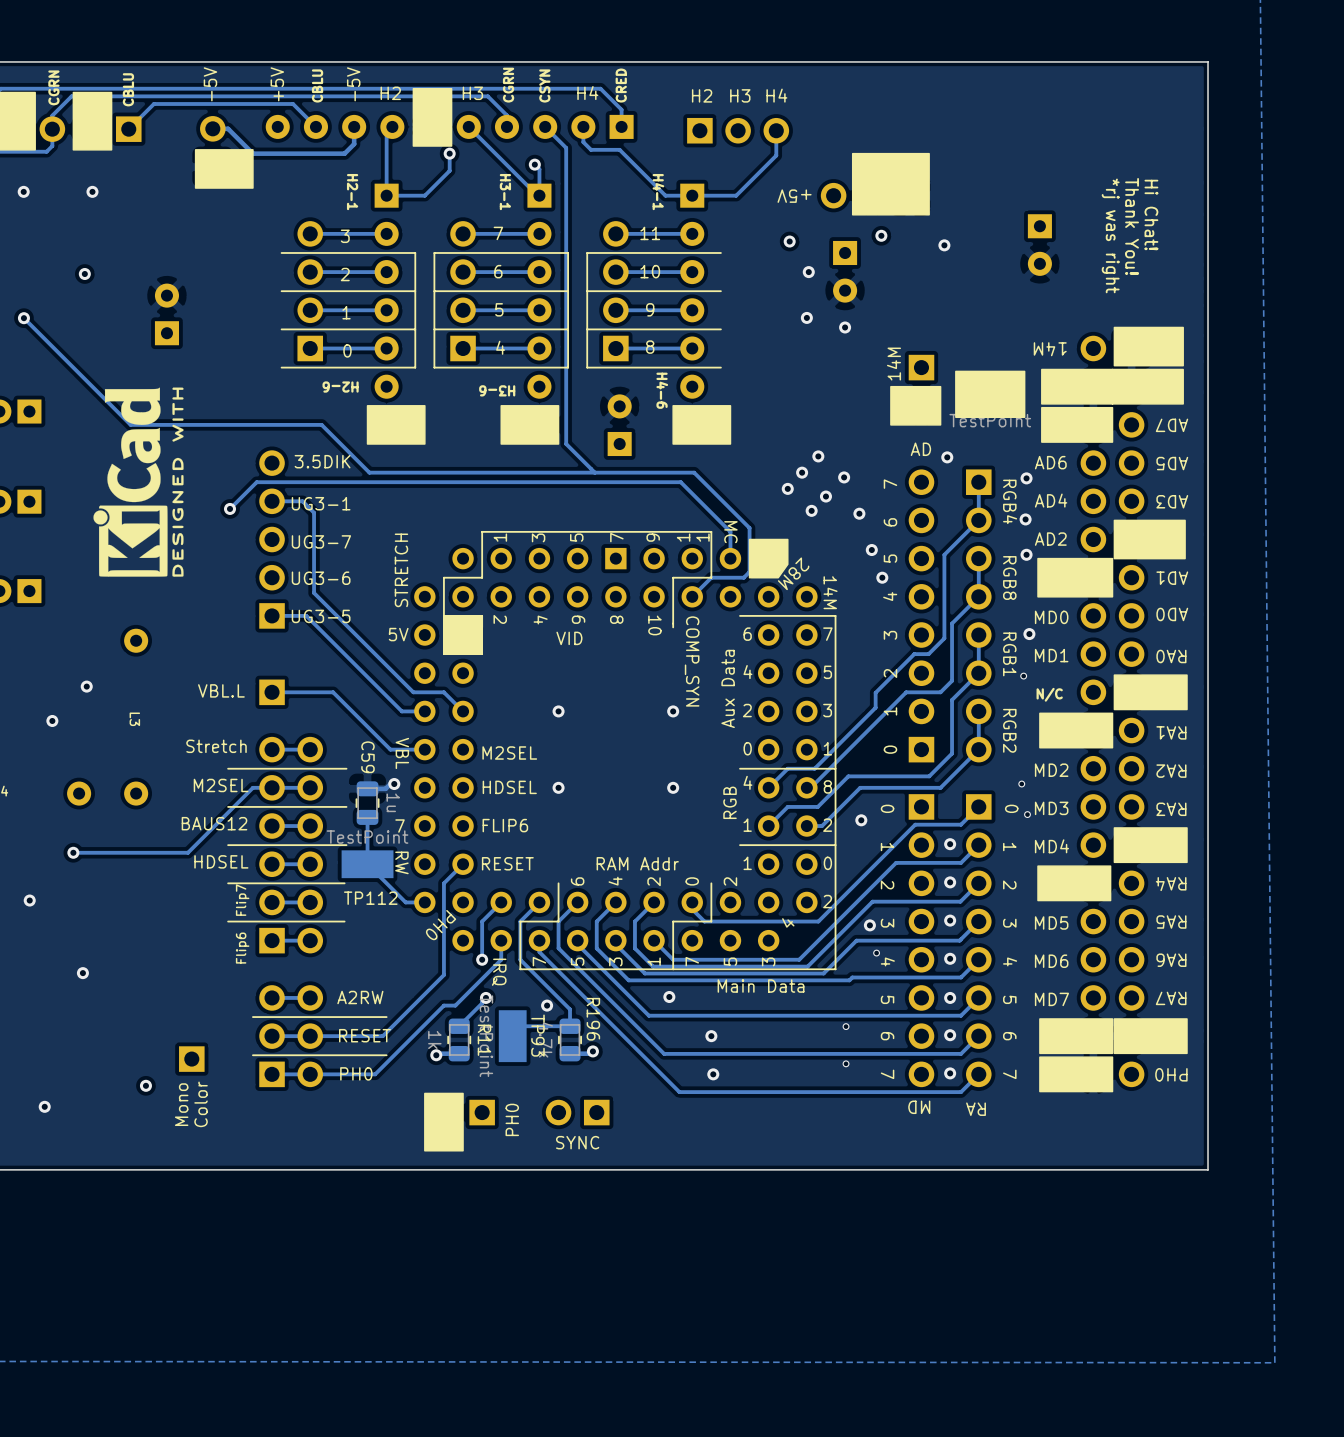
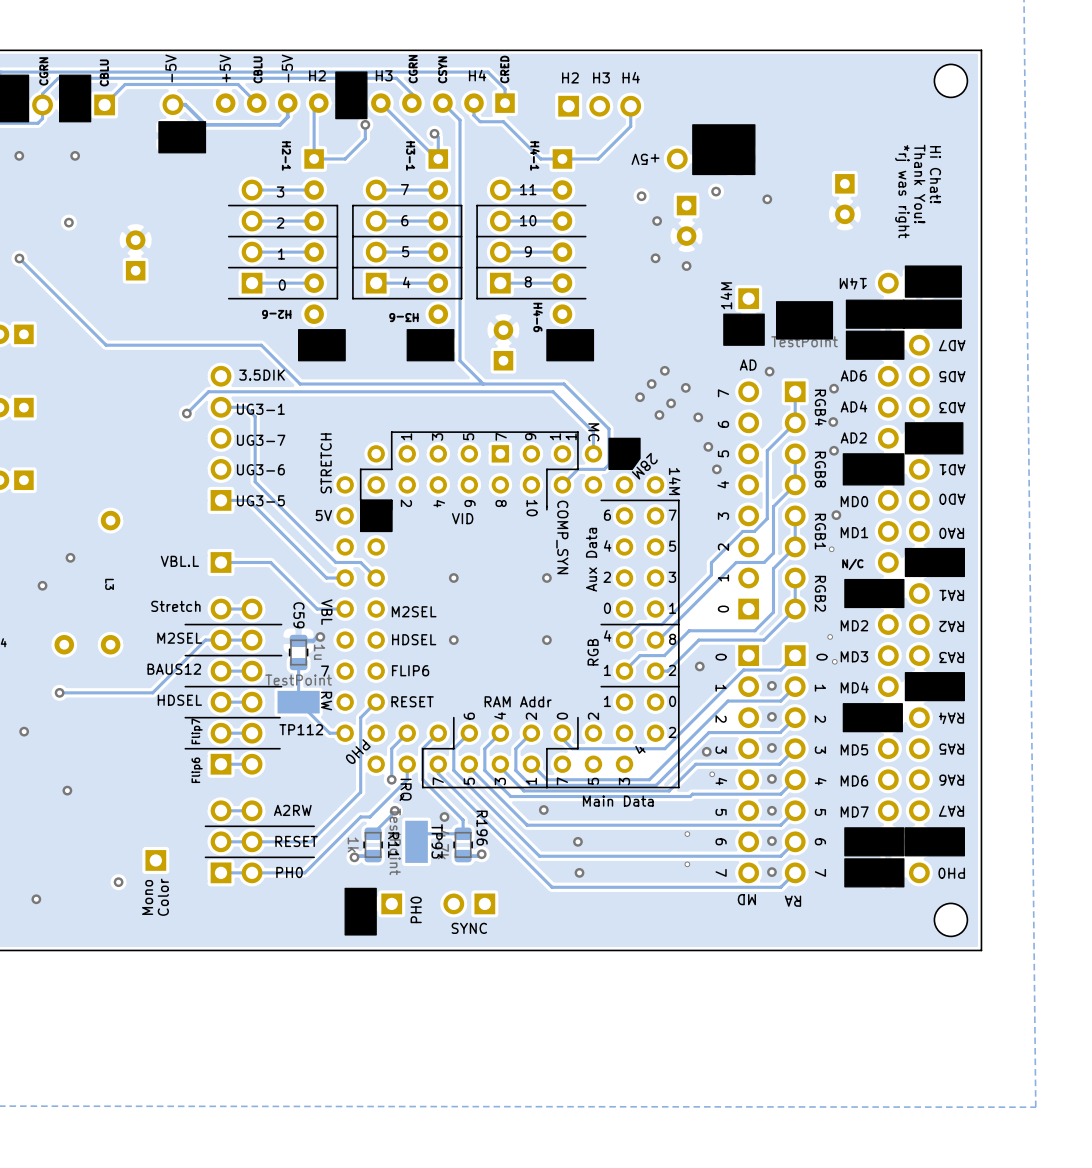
part: none -> (950, 80)
drawing: [93, 387, 184, 577] -> none
part: none -> (950, 919)

